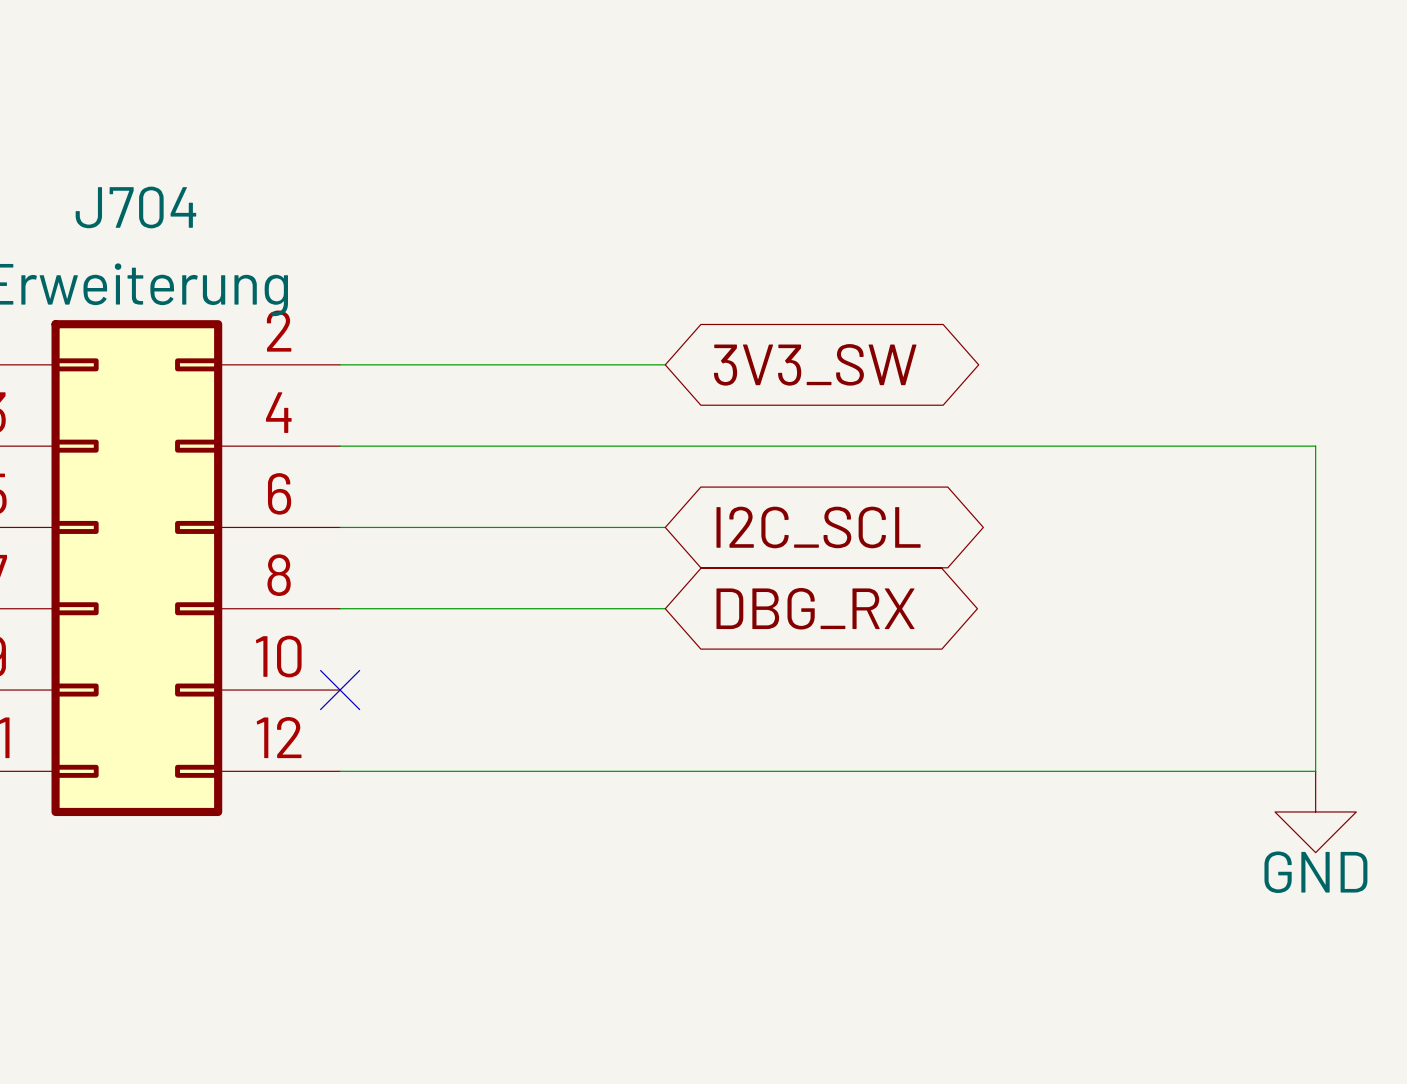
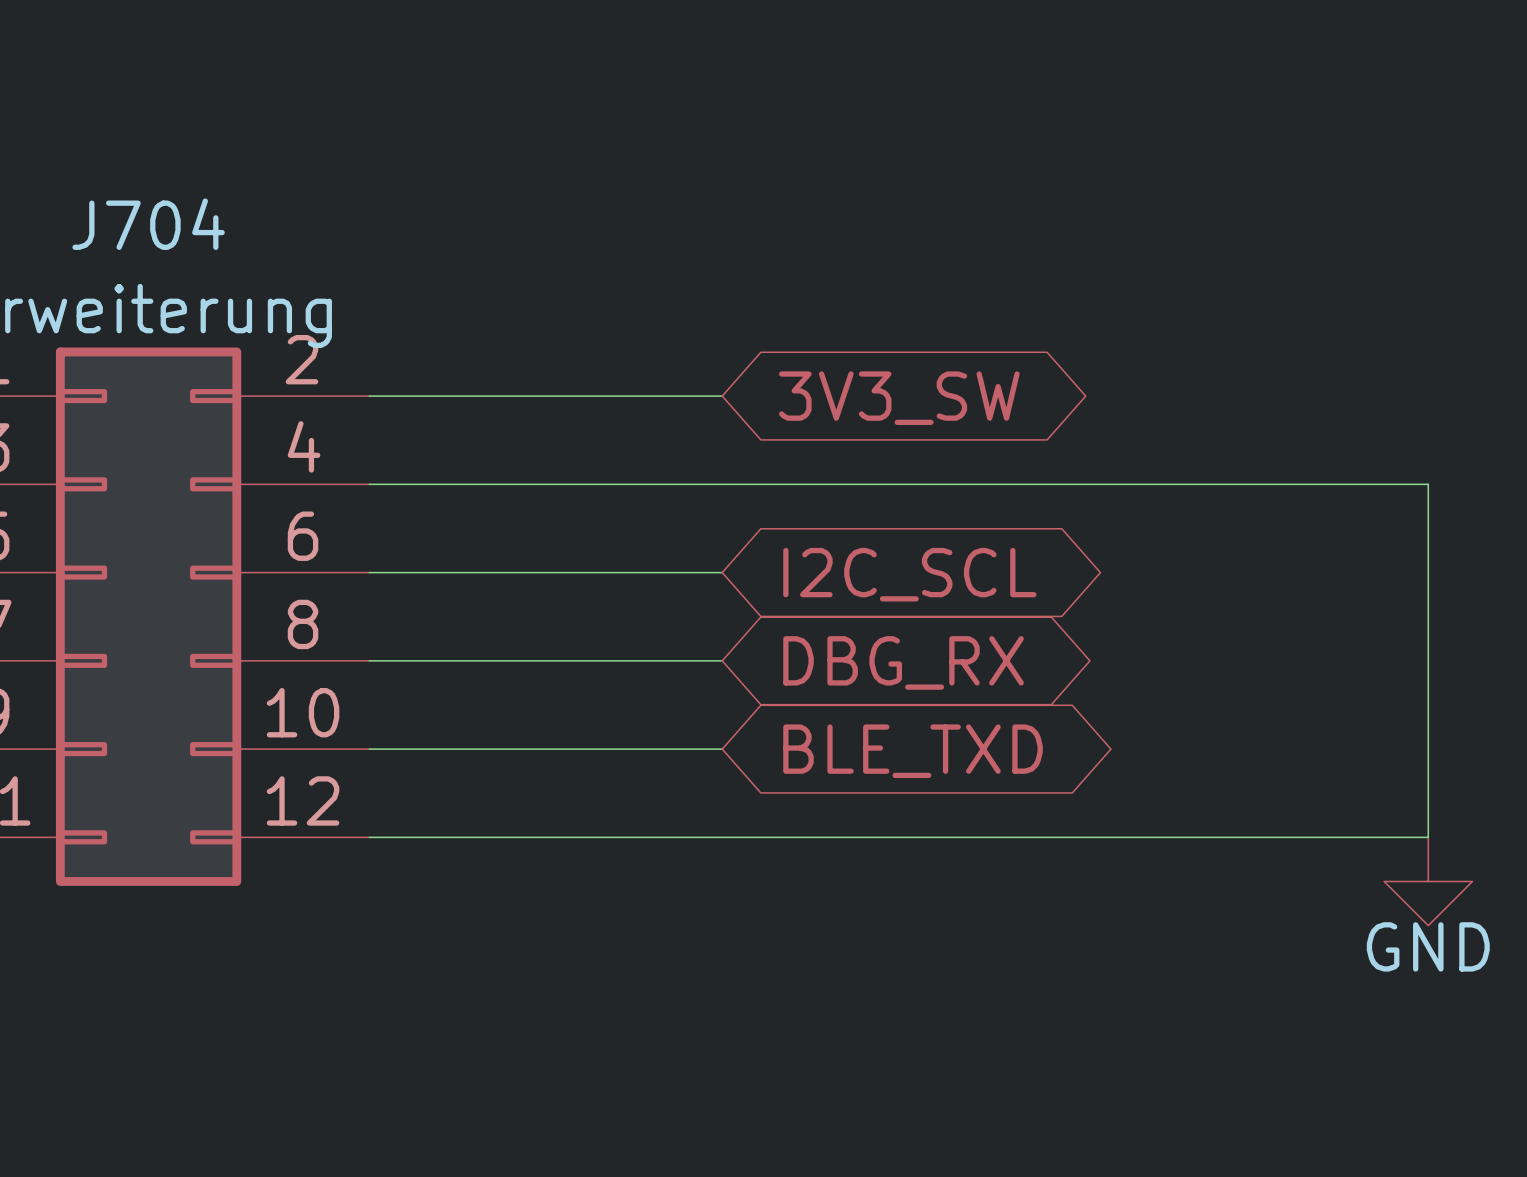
wire: none -> (369, 749) (722, 749)
no-connect mark: (340, 690) -> none
global label: none -> BLE_TXD (913, 751)

